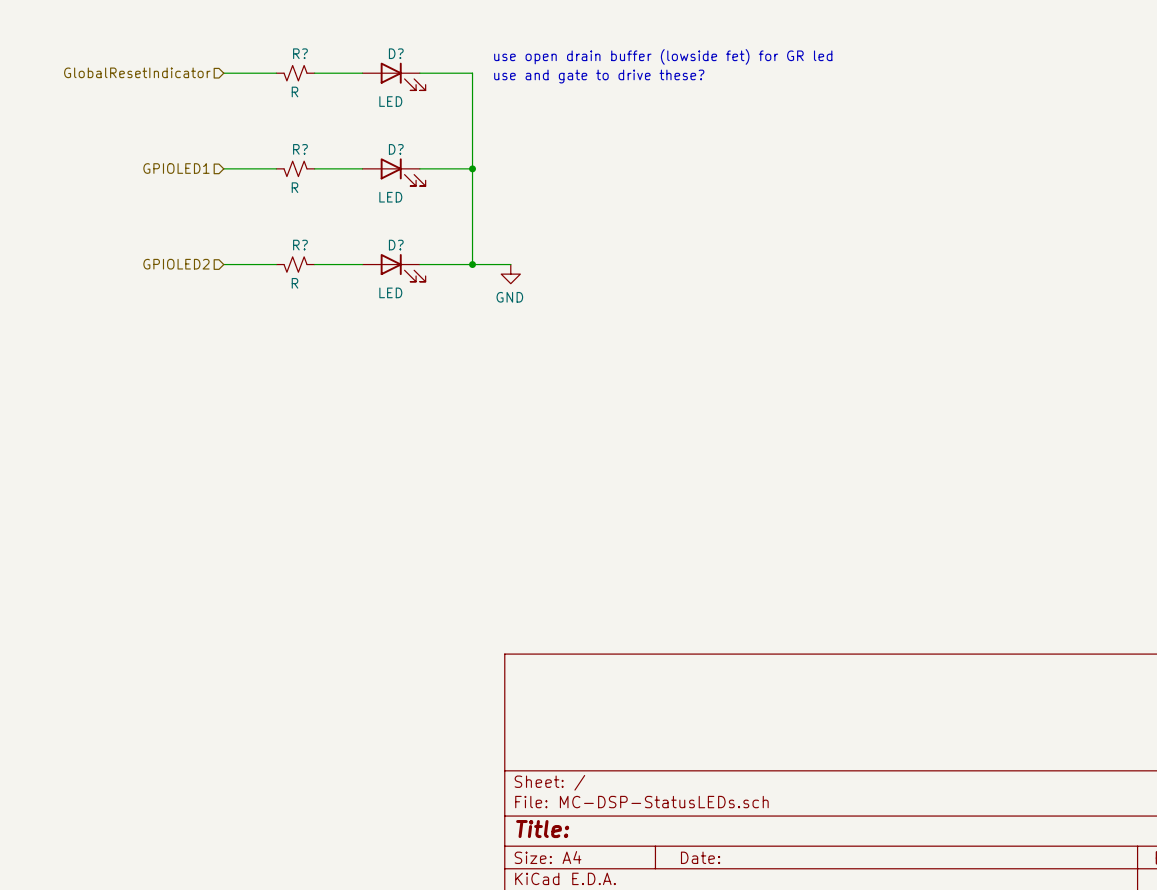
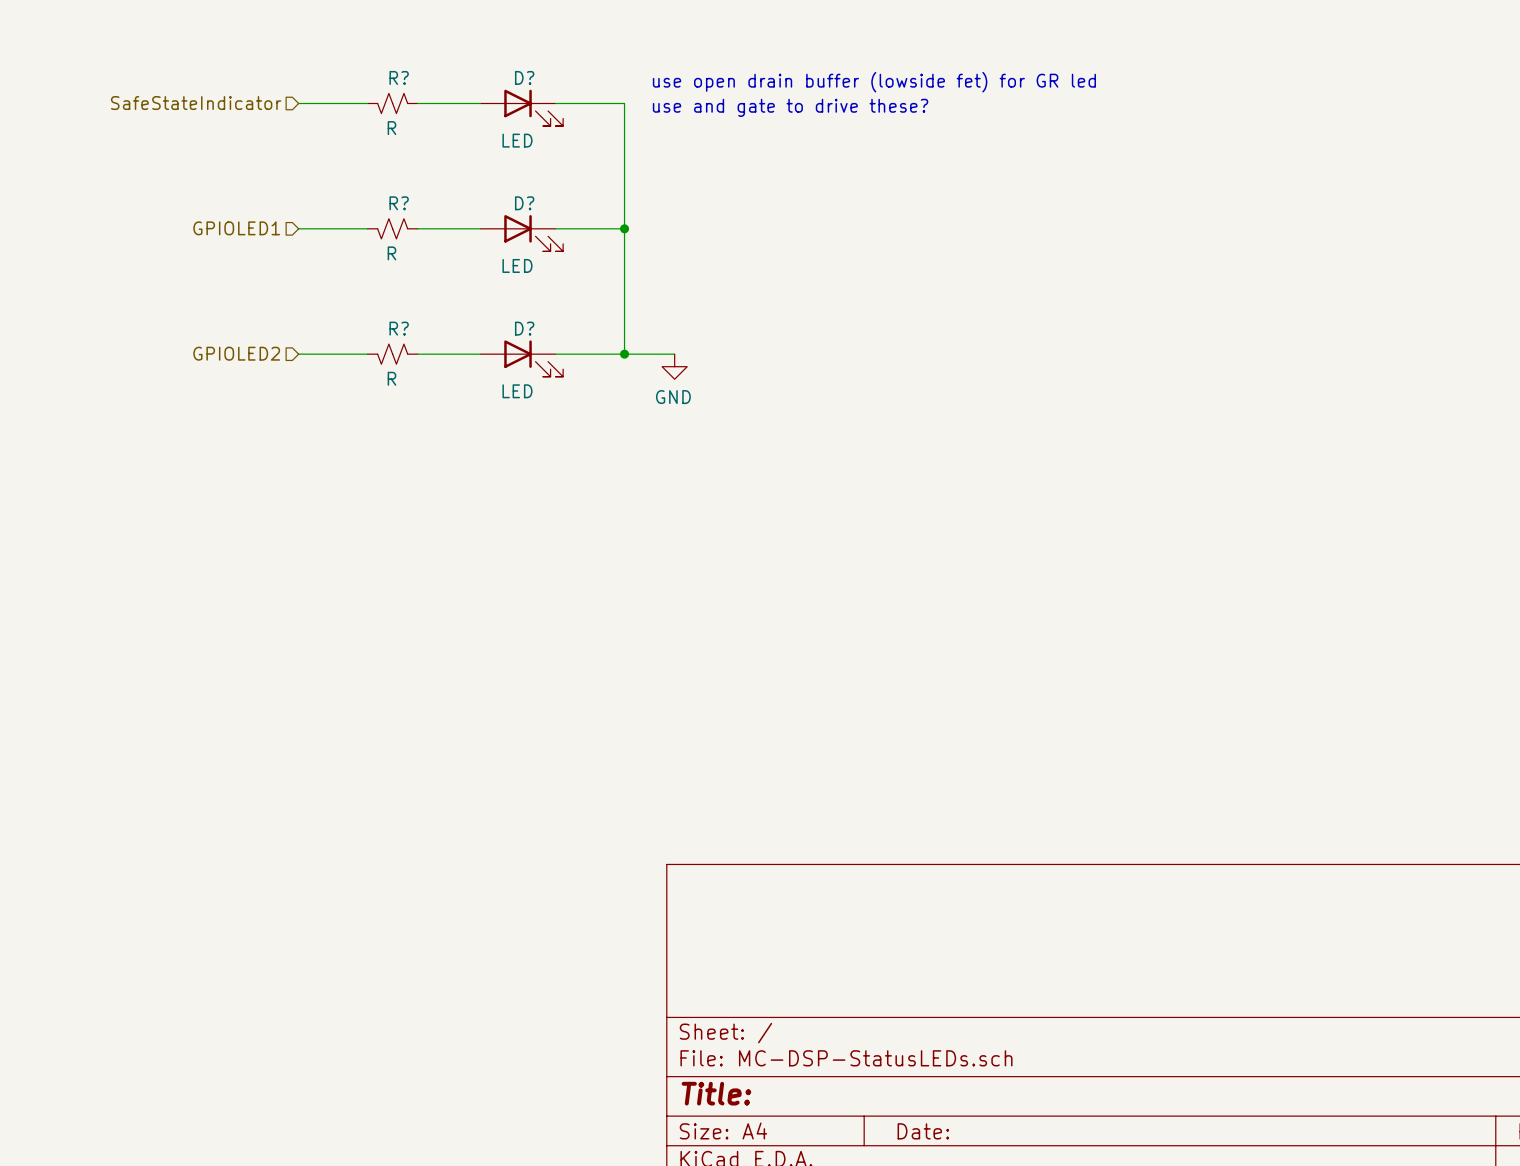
hierarchical label: GlobalResetIndicator (137, 72) -> SafeStateIndicator (196, 103)

